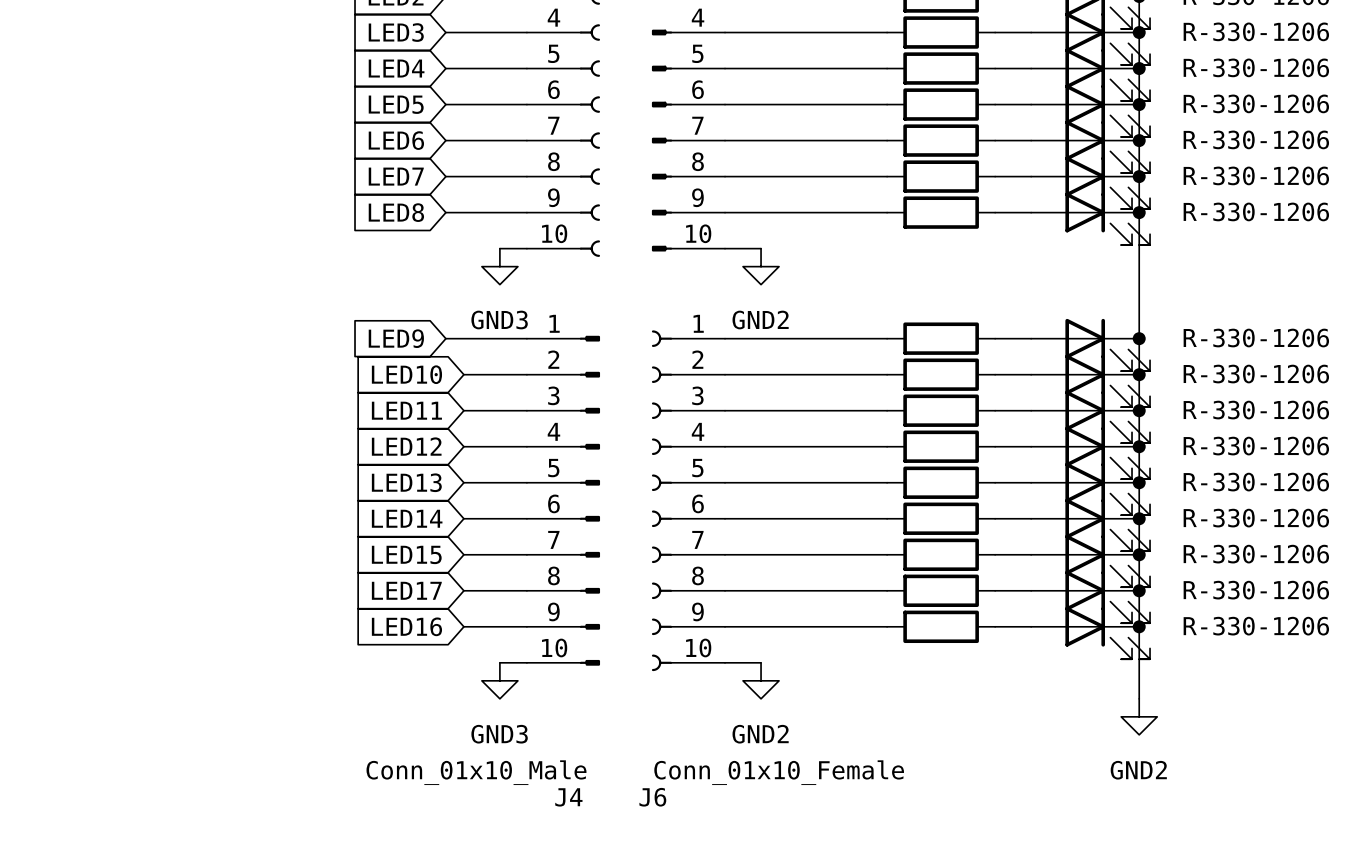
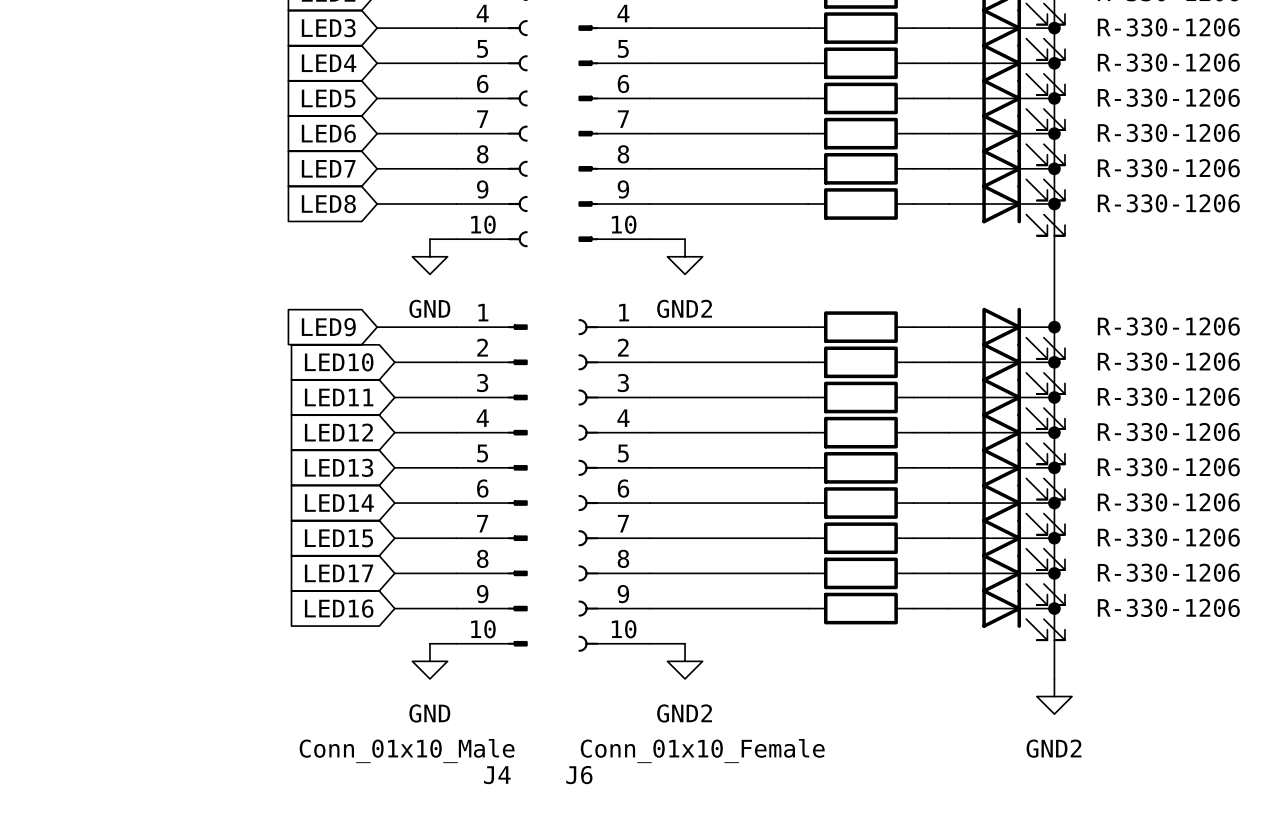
power symbol: GND3 (499, 266) -> GND (429, 256)
power symbol: GND3 (499, 680) -> GND (429, 661)

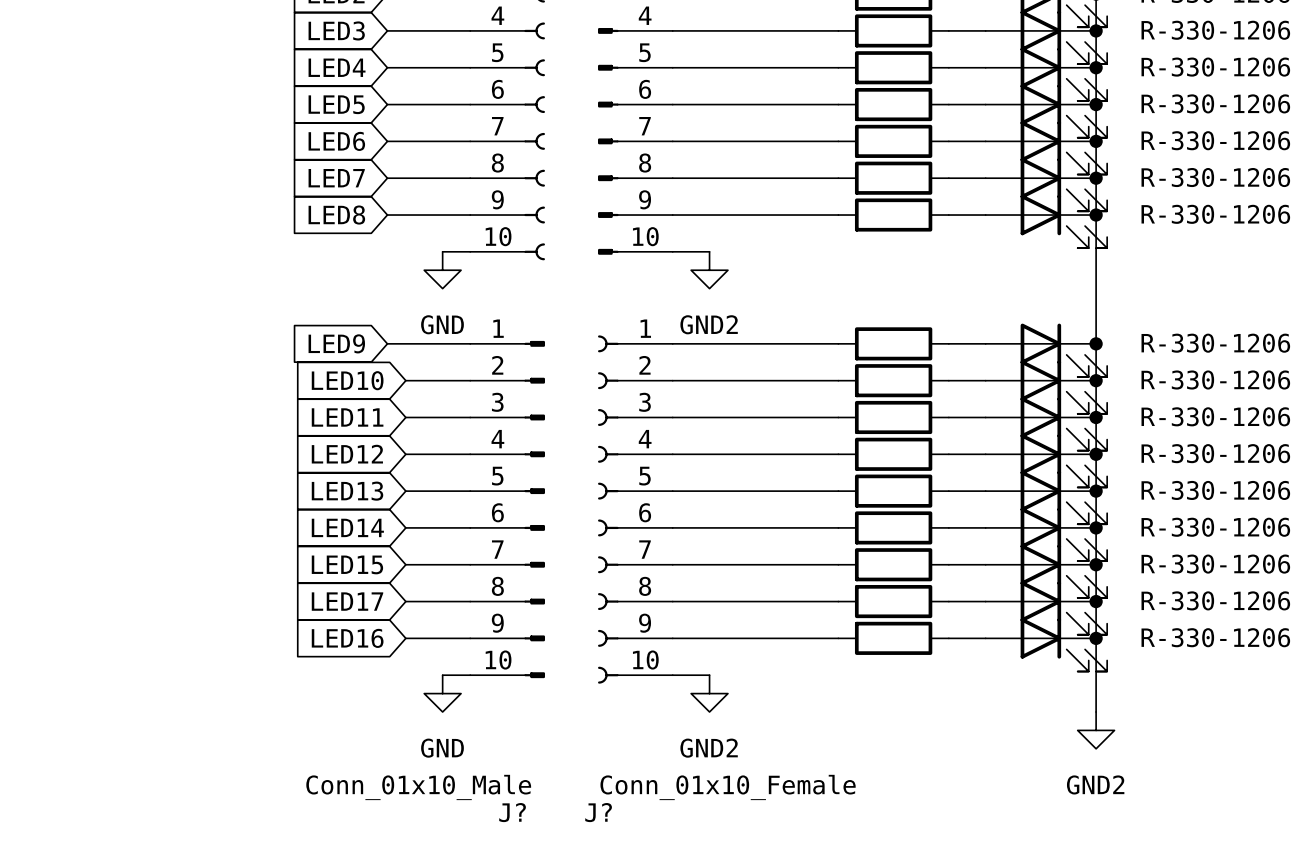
J4 name: J4 (497, 775) -> J? (512, 812)
J6 name: J6 (579, 775) -> J? (598, 812)

